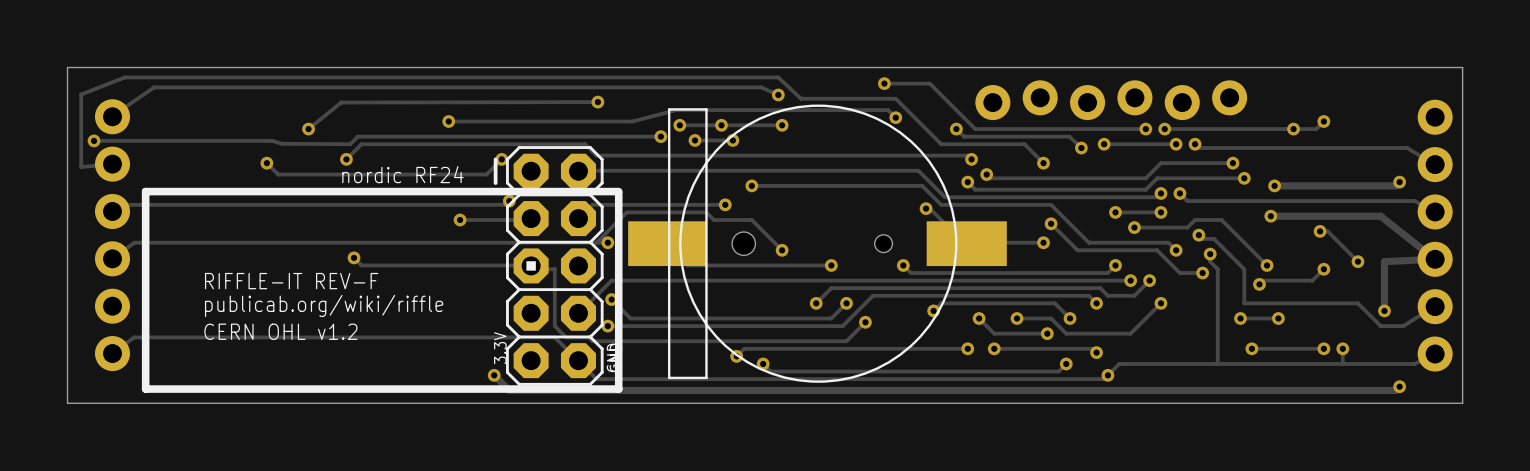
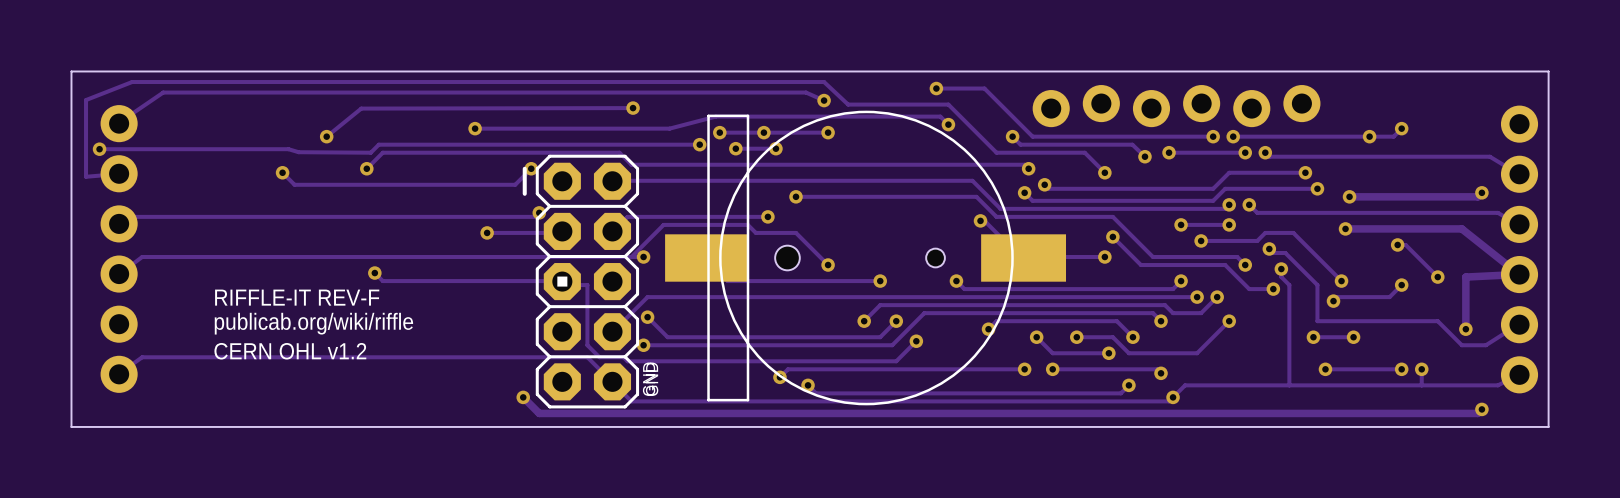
text: nordic RF24 (402, 174) -> none
line: (618, 191) (145, 191) (145, 389) (618, 389) (618, 193) -> none
text: 3.3V (500, 348) -> none

